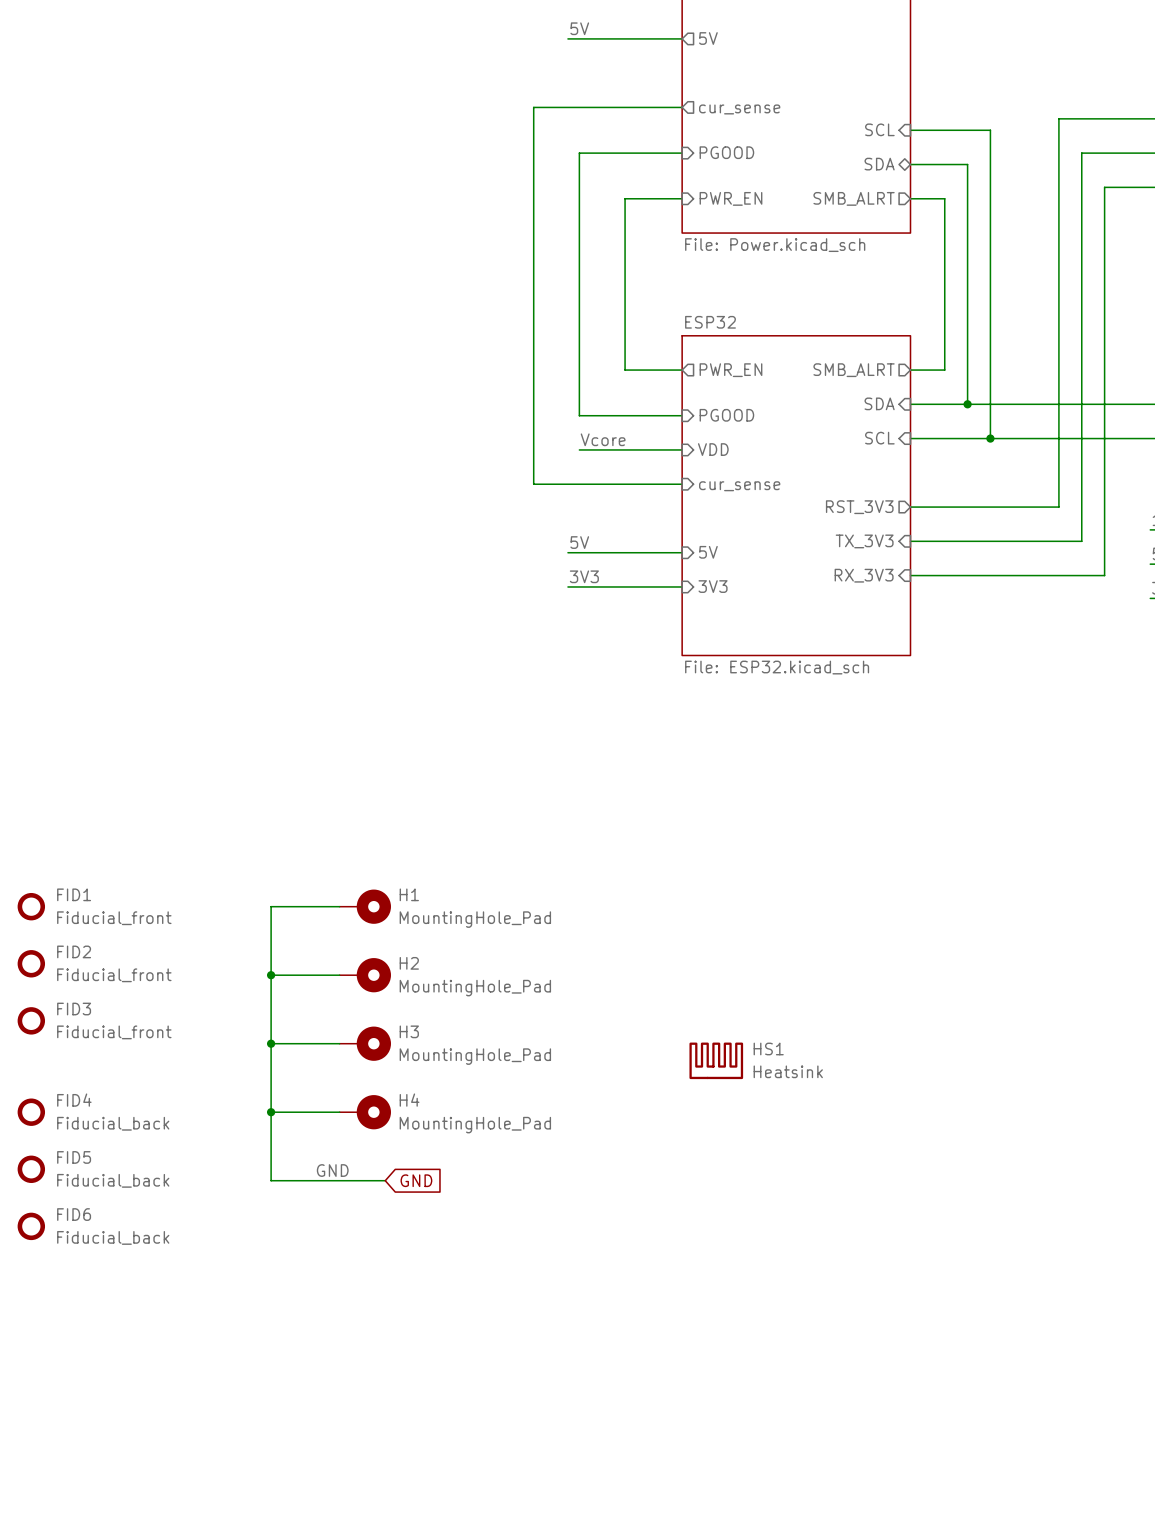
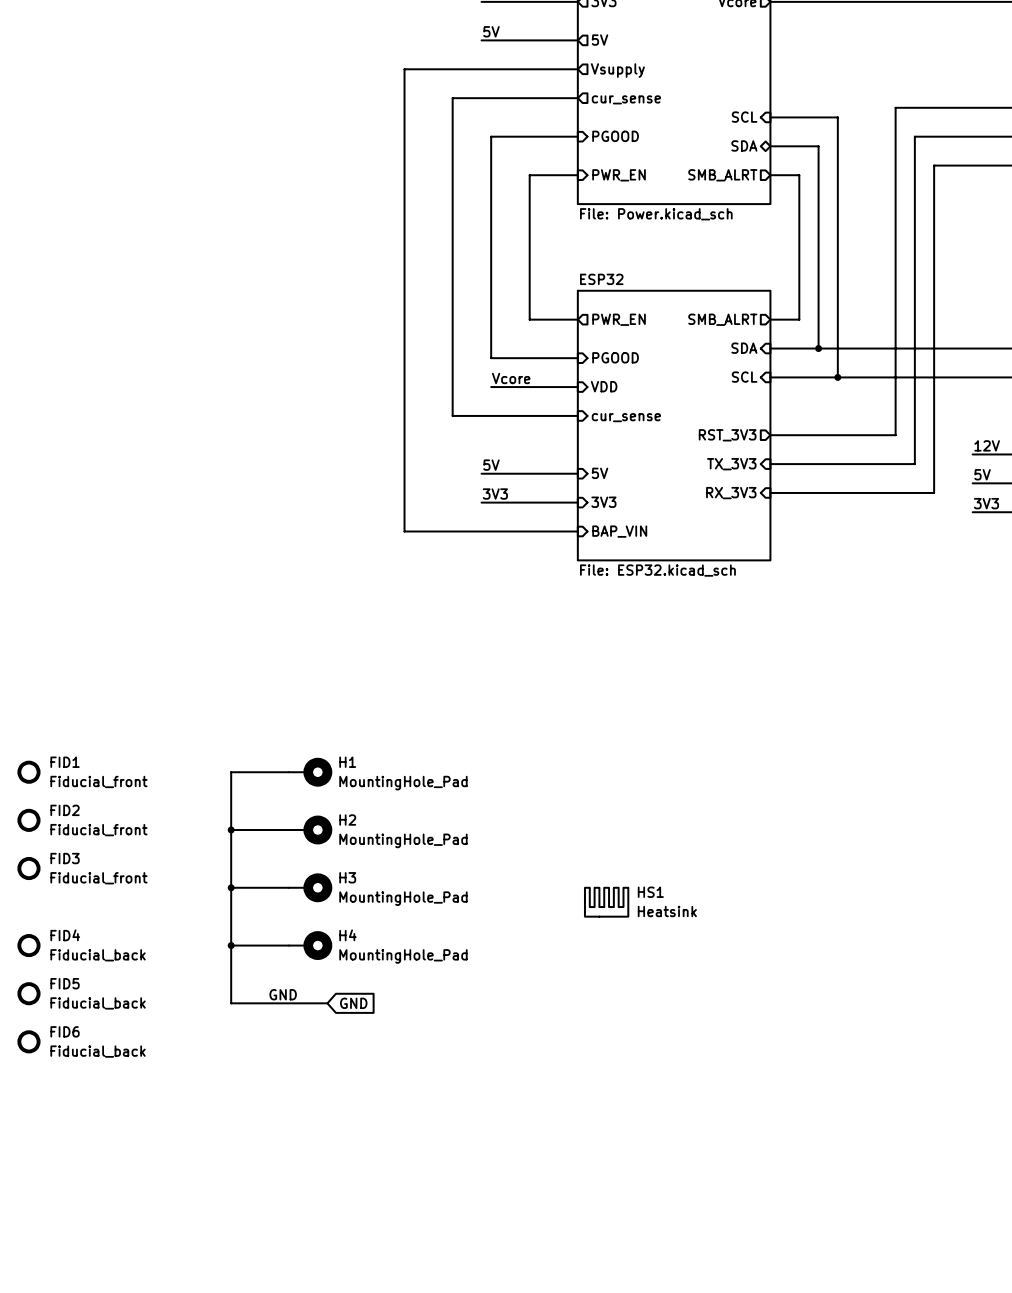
wire: none -> (577, 69) (404, 69) (404, 531) (577, 531)
sheet pin: none -> Vsupply (617, 70)
sheet pin: none -> BAP_VIN (619, 531)

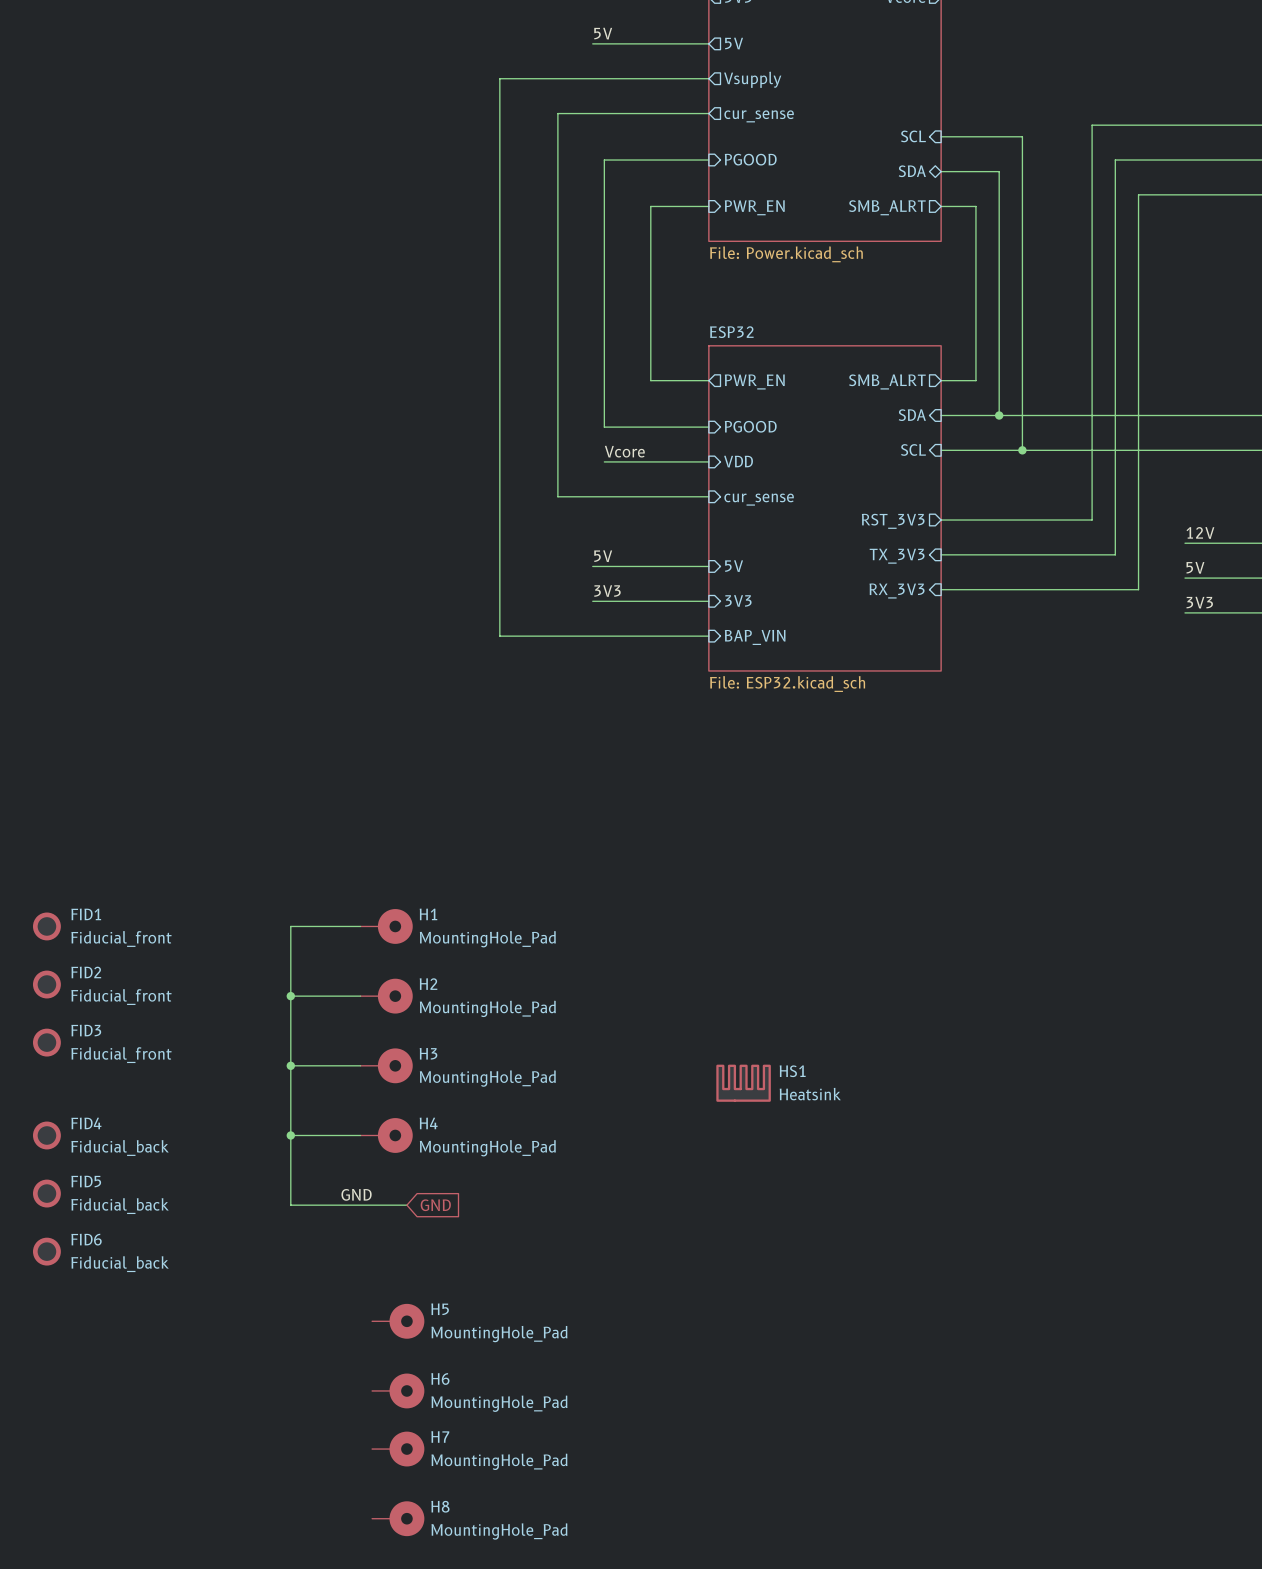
H5: none -> MountingHole_Pad (398, 1321)
H6: none -> MountingHole_Pad (398, 1390)
H7: none -> MountingHole_Pad (398, 1449)
H8: none -> MountingHole_Pad (398, 1518)

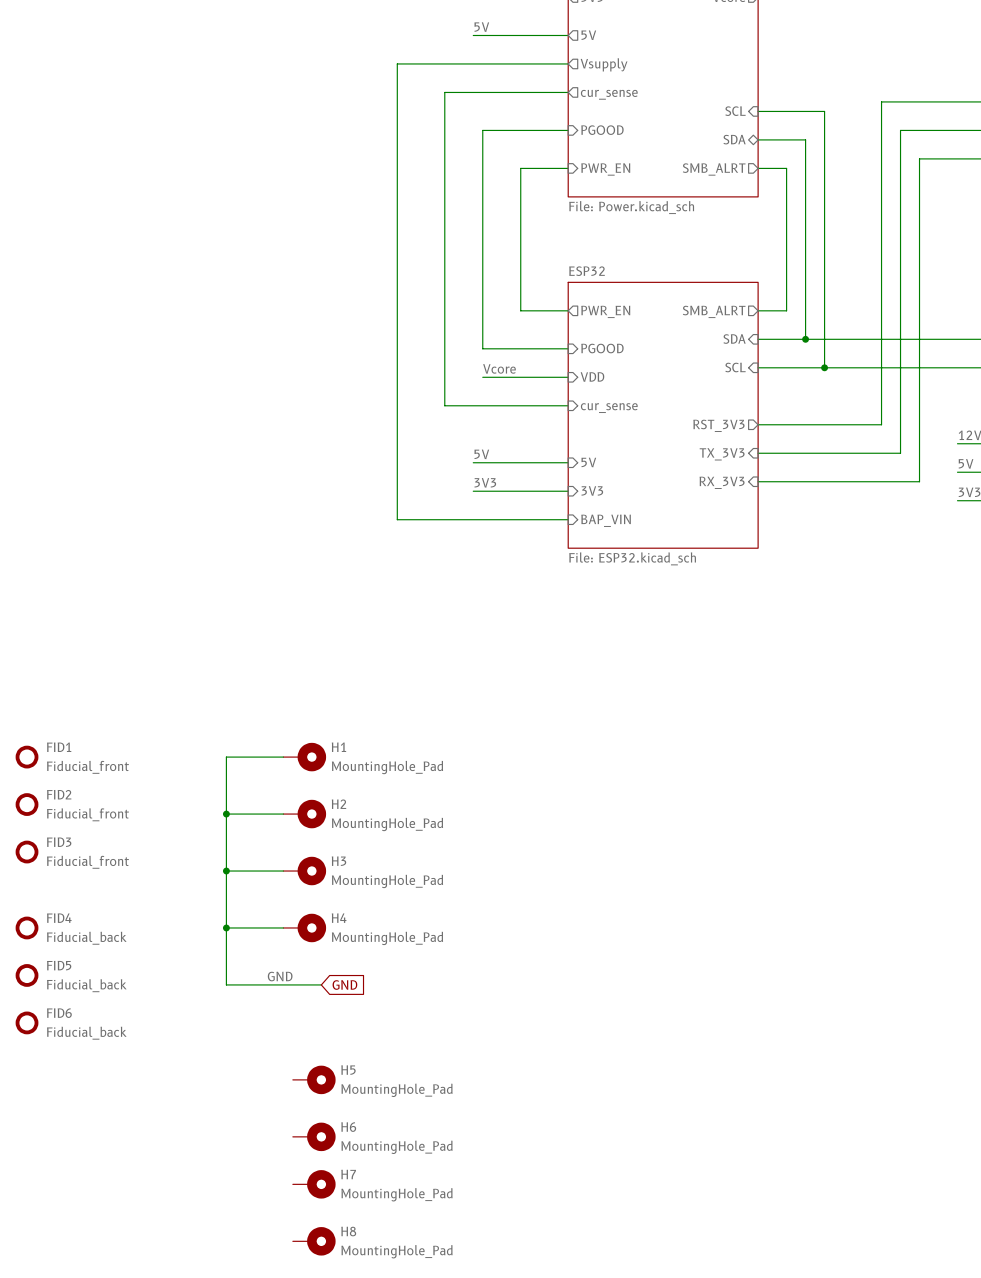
HS1: Heatsink (743, 1083) -> none

